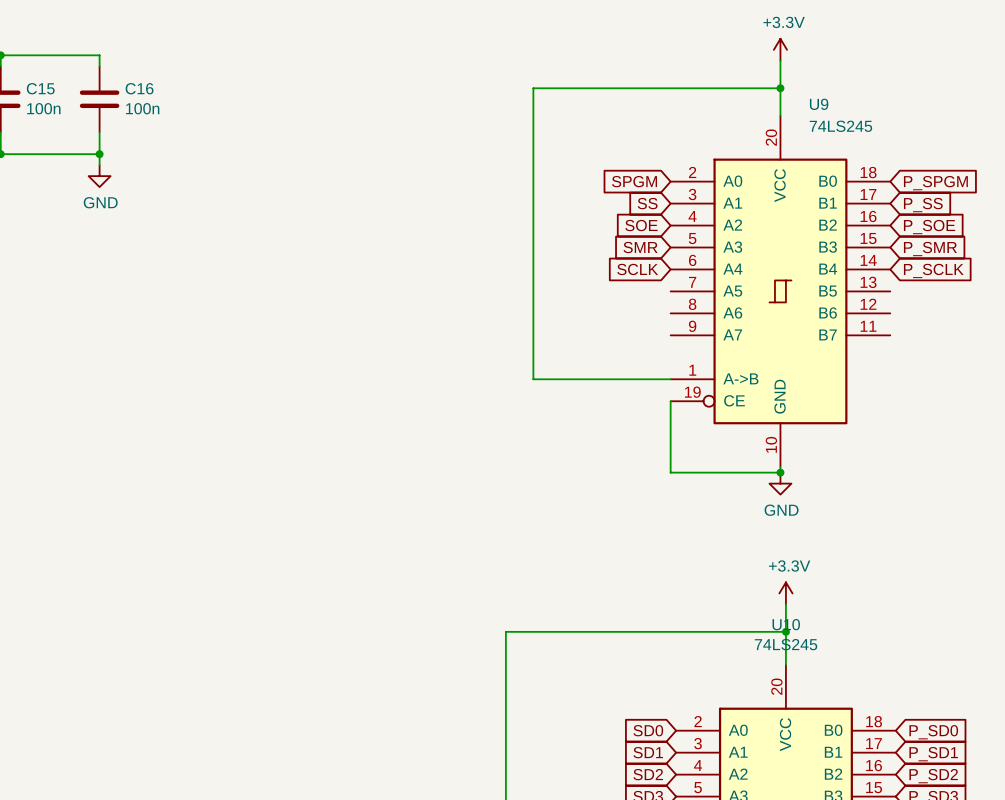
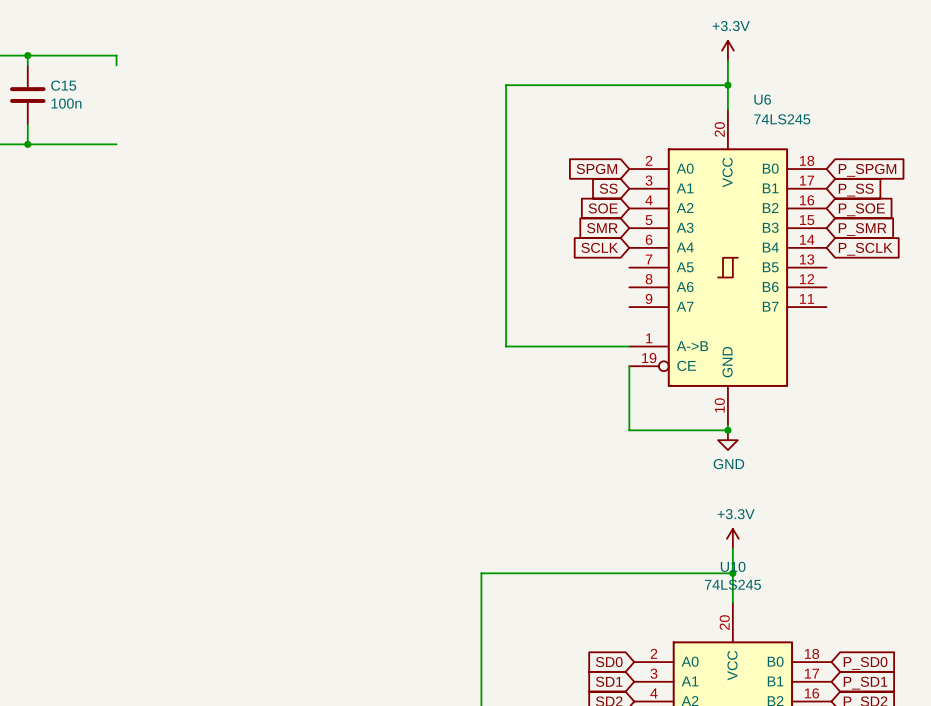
C16: 100n (99, 99) -> none
U9 name: U9 (819, 104) -> U6 (762, 99)
wire: (99, 132) (99, 165) -> none
junction: (99, 154) -> none
power symbol: GND (99, 176) -> none

